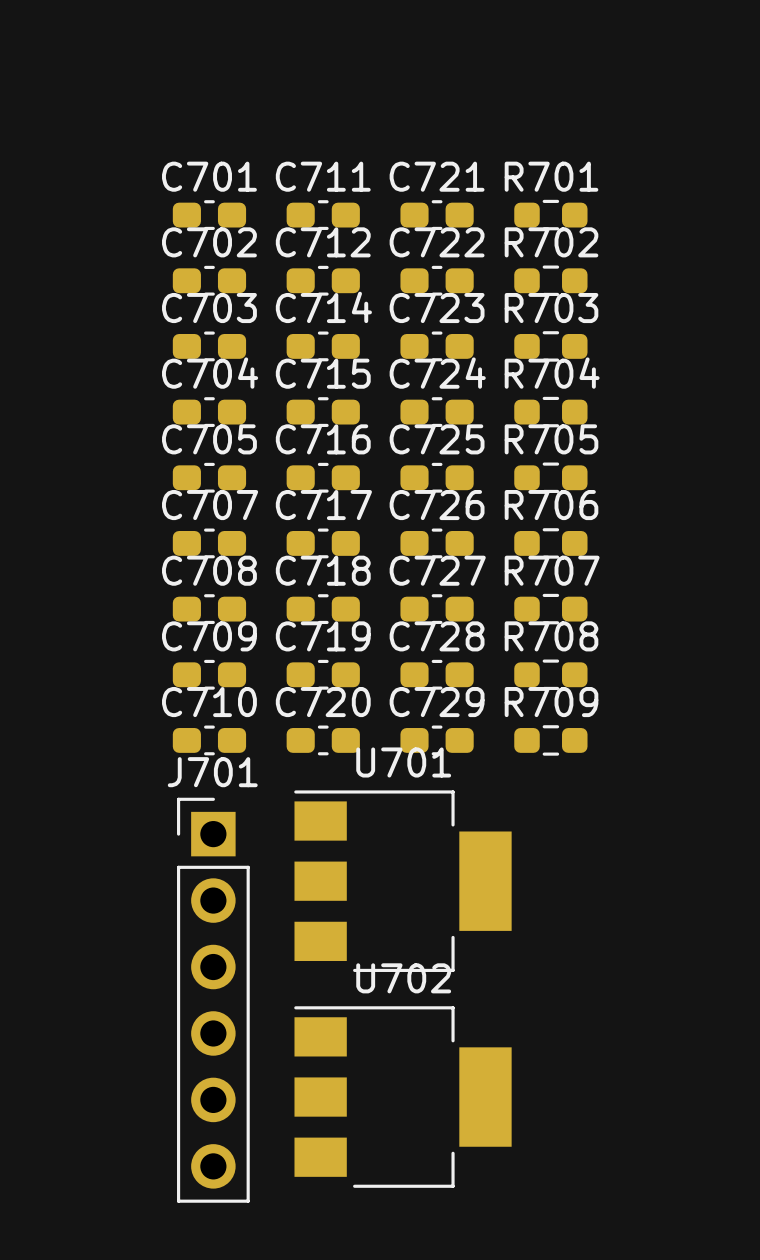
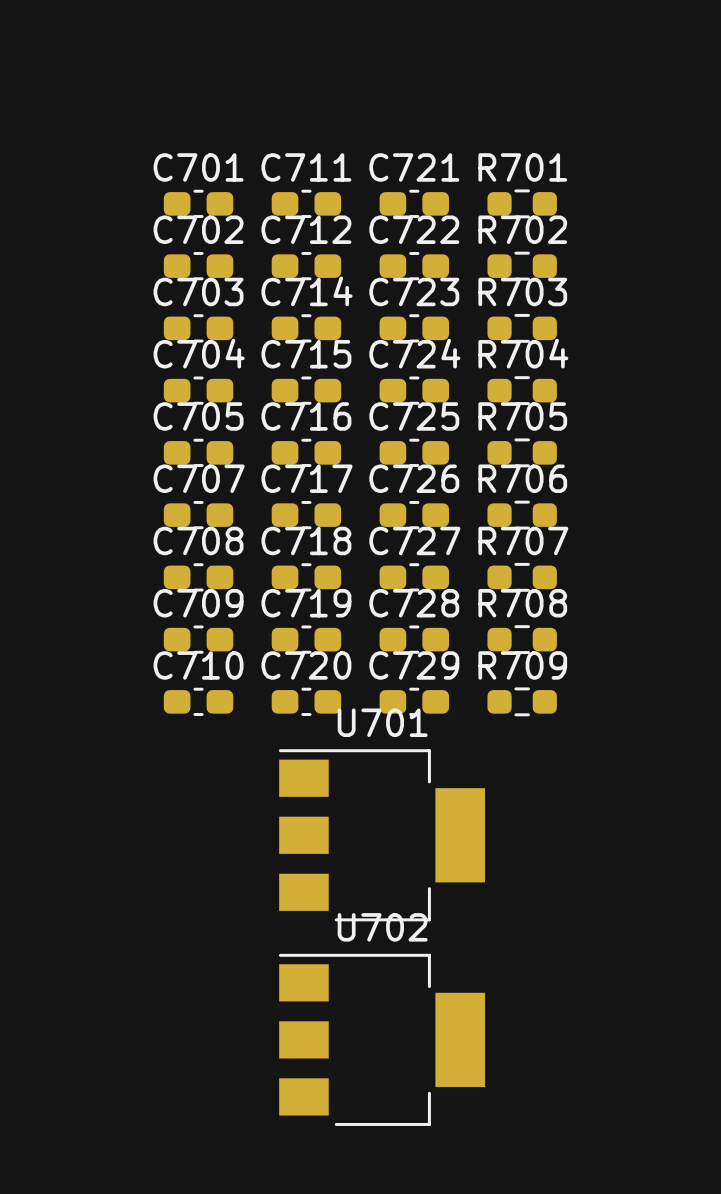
J701: (213, 1000) -> none

